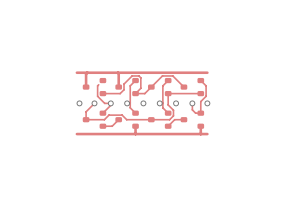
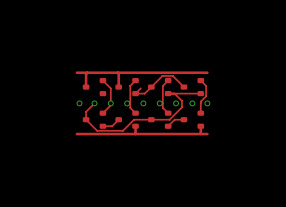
top track: none -> (102, 80) (110, 88) (110, 103)
top track: (98, 84) (97, 96) (104, 103) (110, 102) -> none
top track: (140, 88) (140, 77) (132, 75) (124, 84) (124, 89) (120, 93) (102, 93) -> none
top track: (168, 93) (168, 104) (173, 110) (173, 115) -> (174, 93) (181, 100) (181, 107) (173, 115)
top track: (192, 103) (192, 109) (195, 113) (200, 113) -> none
top track: (134, 119) (126, 119) (122, 115) (108, 115) (104, 119) (86, 119) -> (134, 119) (122, 130) (97, 130) (86, 119)

